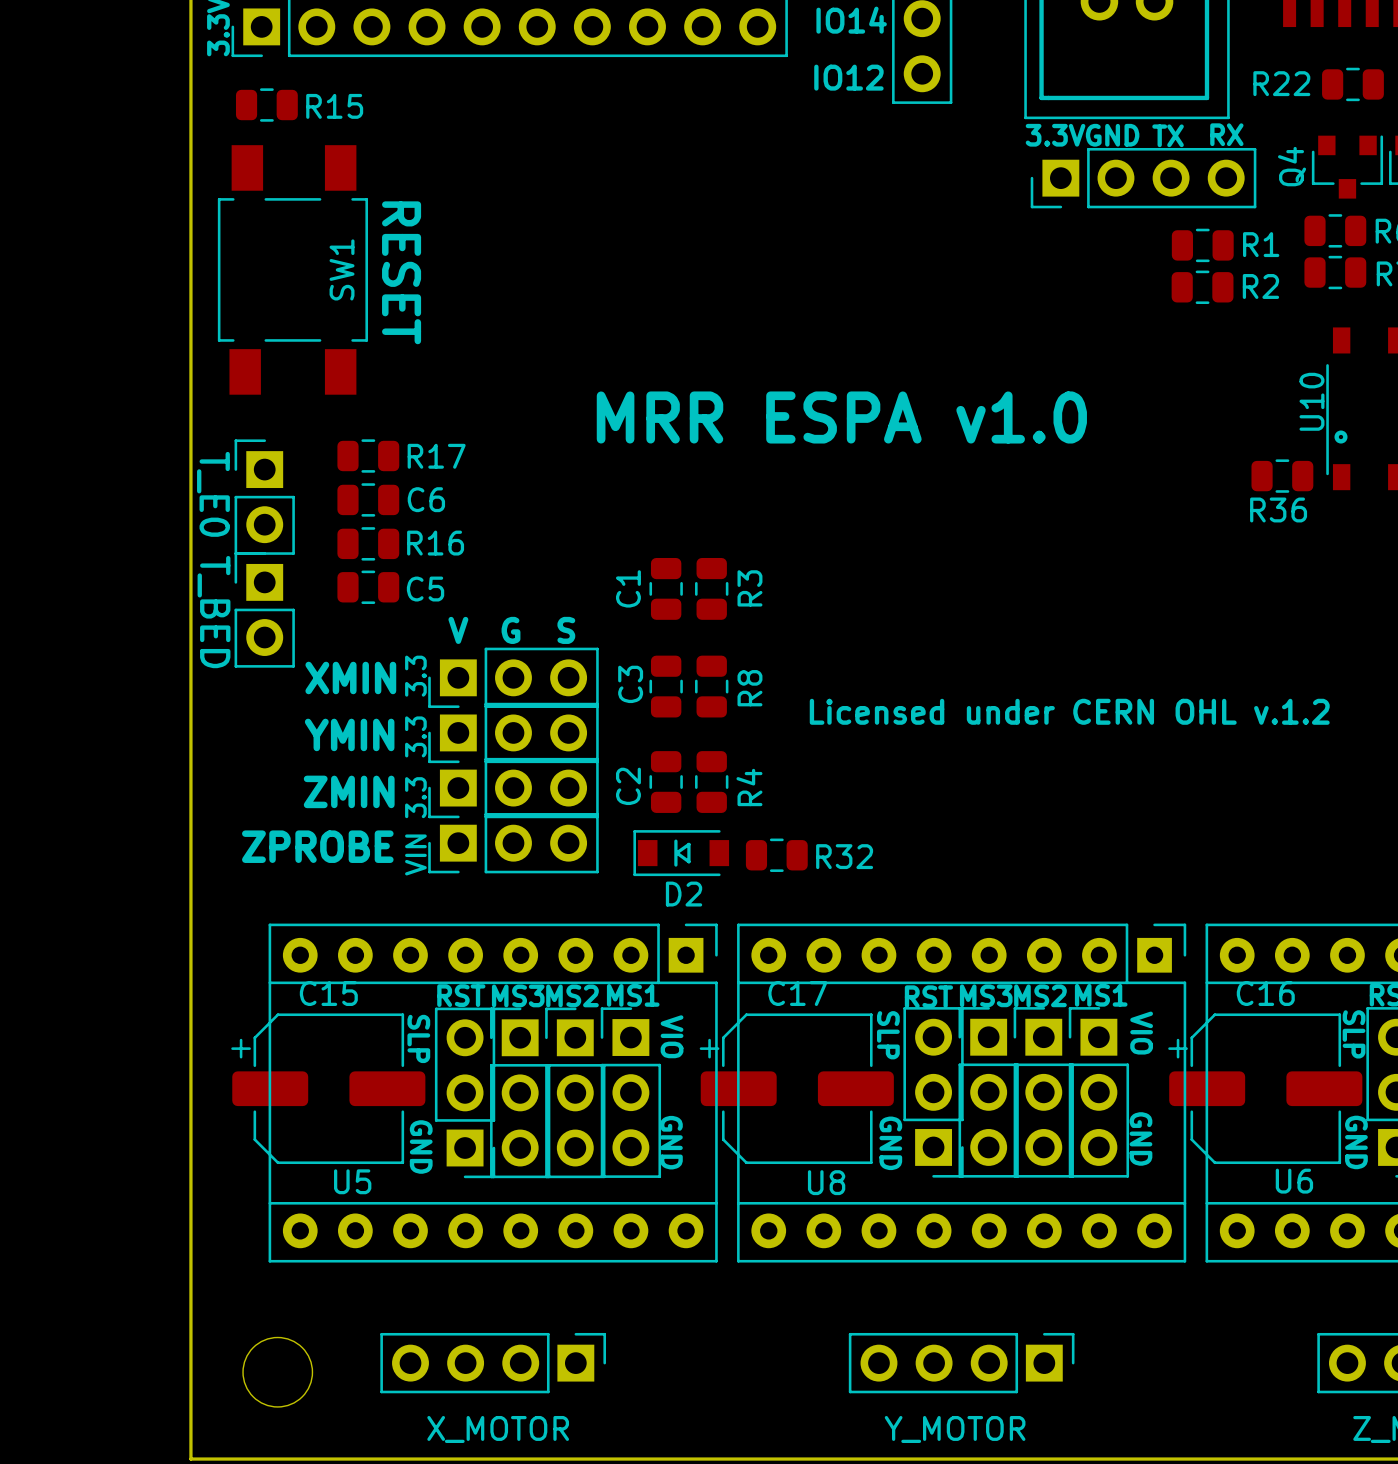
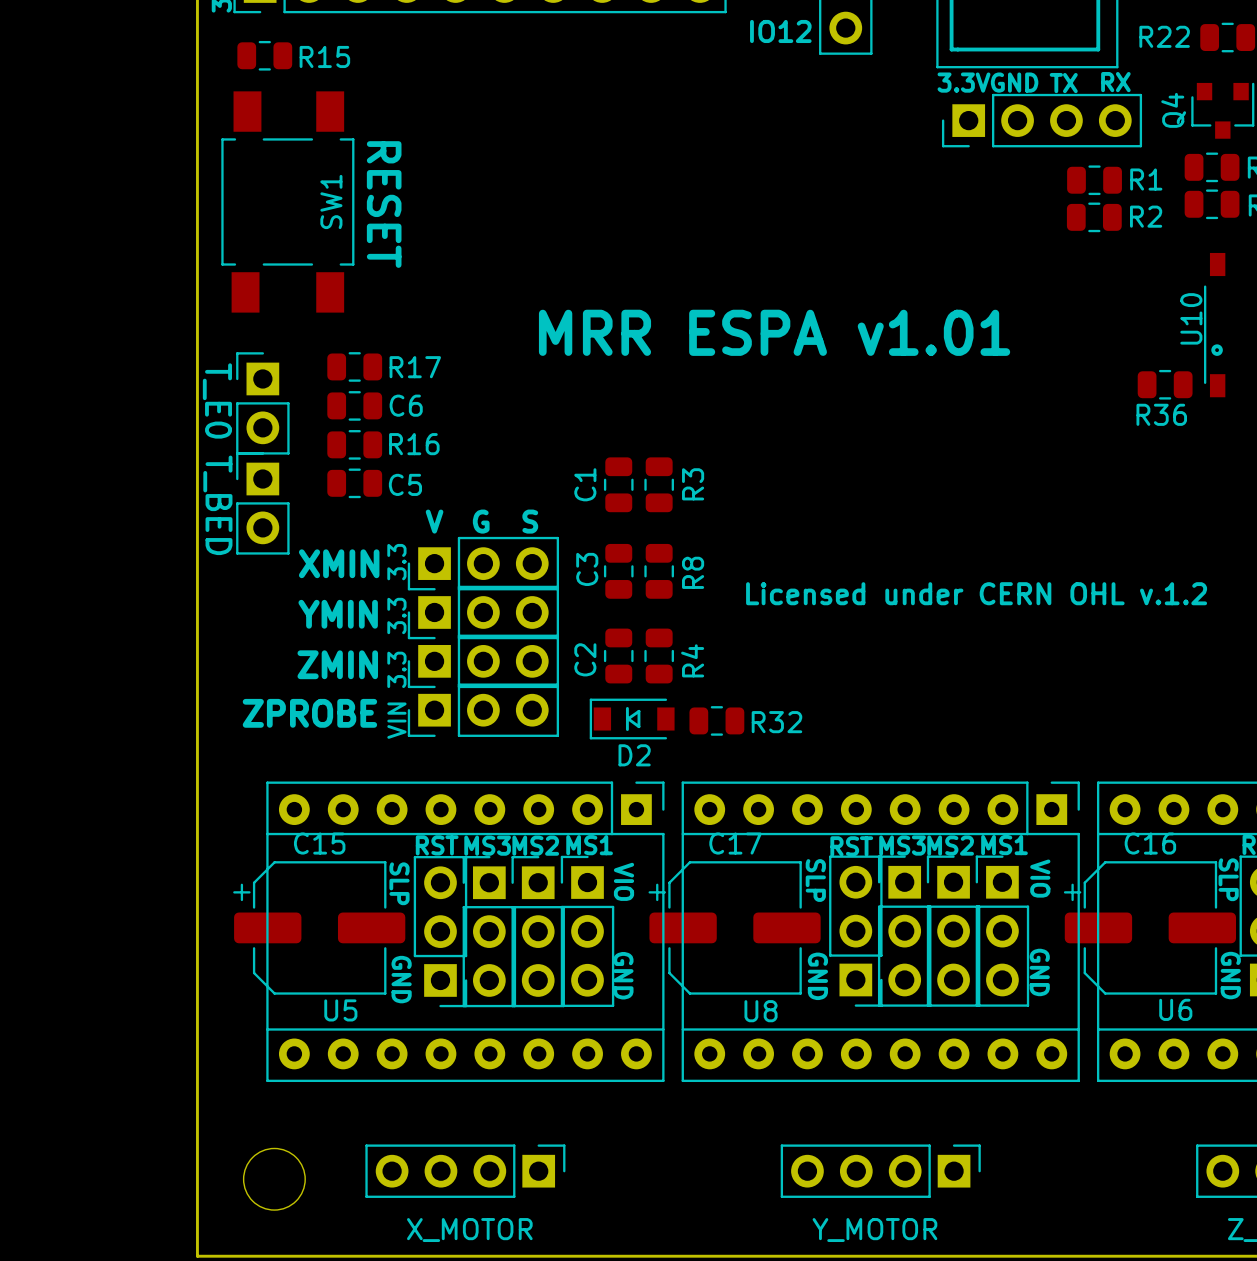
text: MRR ESPA v1.0 (841, 417) -> MRR ESPA v1.01 (774, 332)

